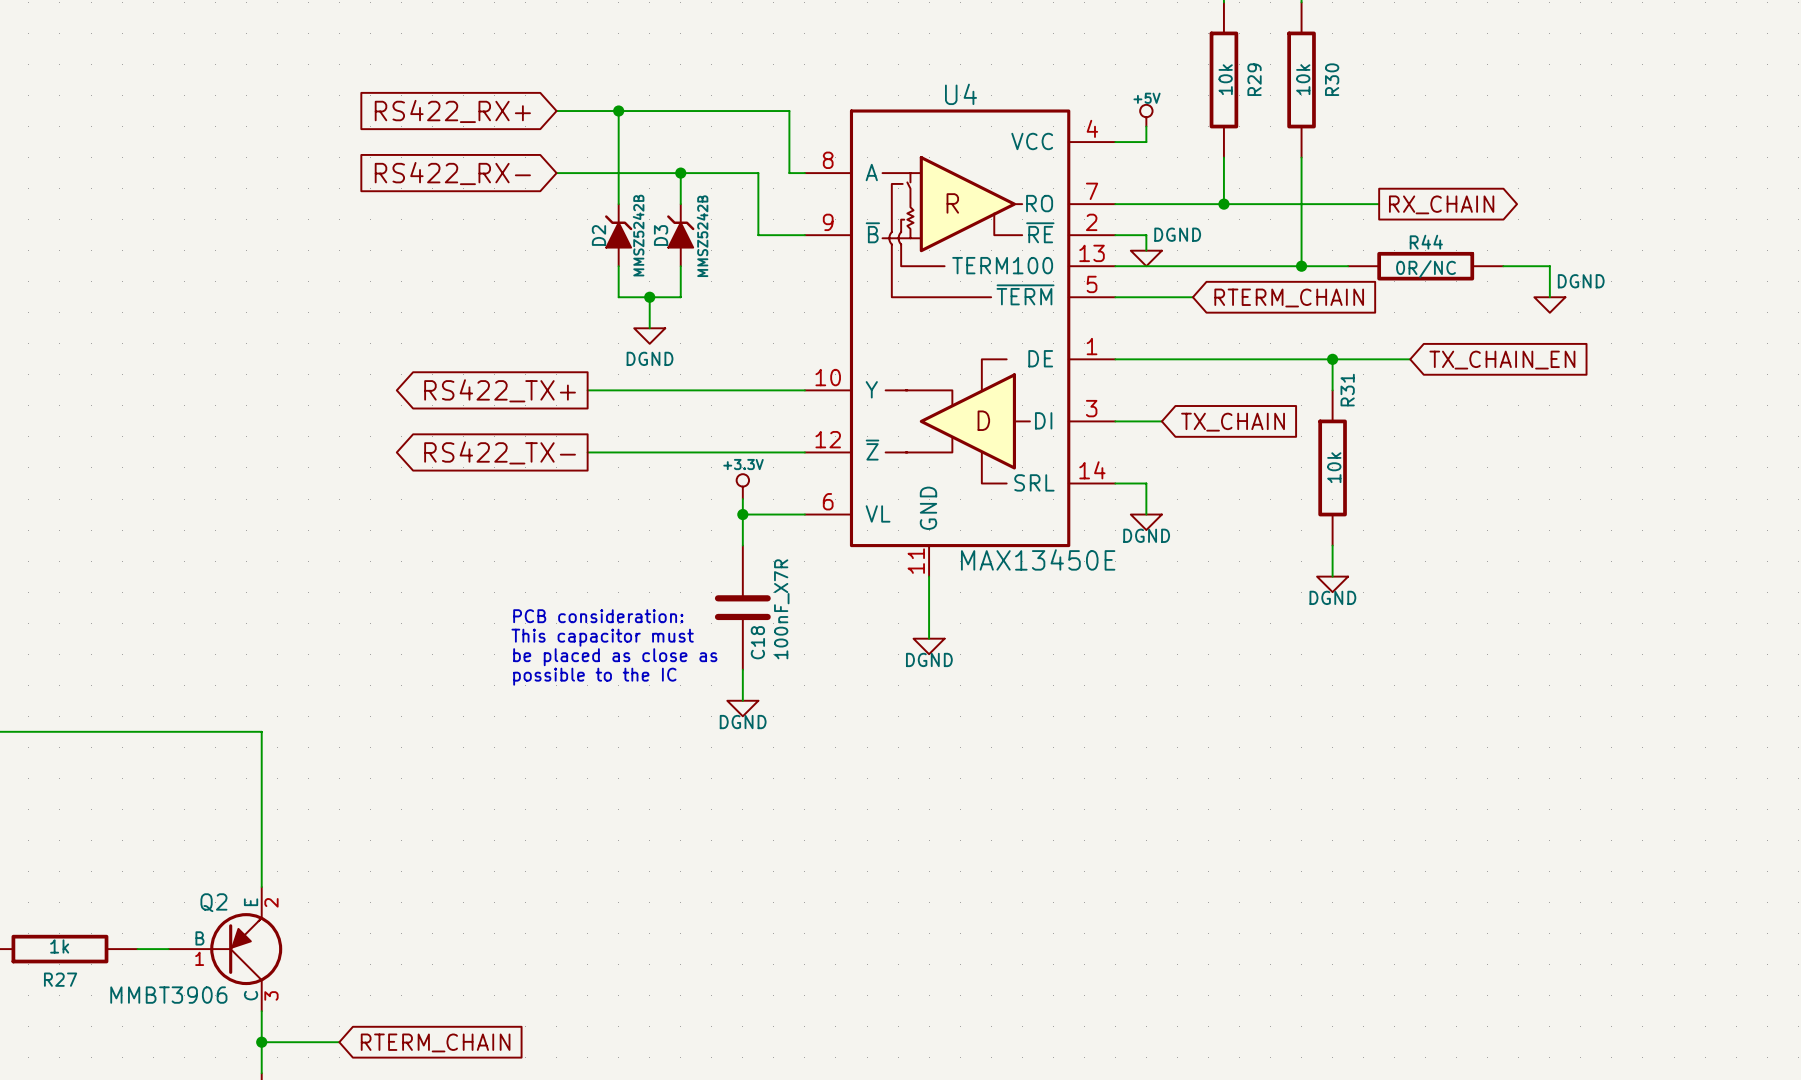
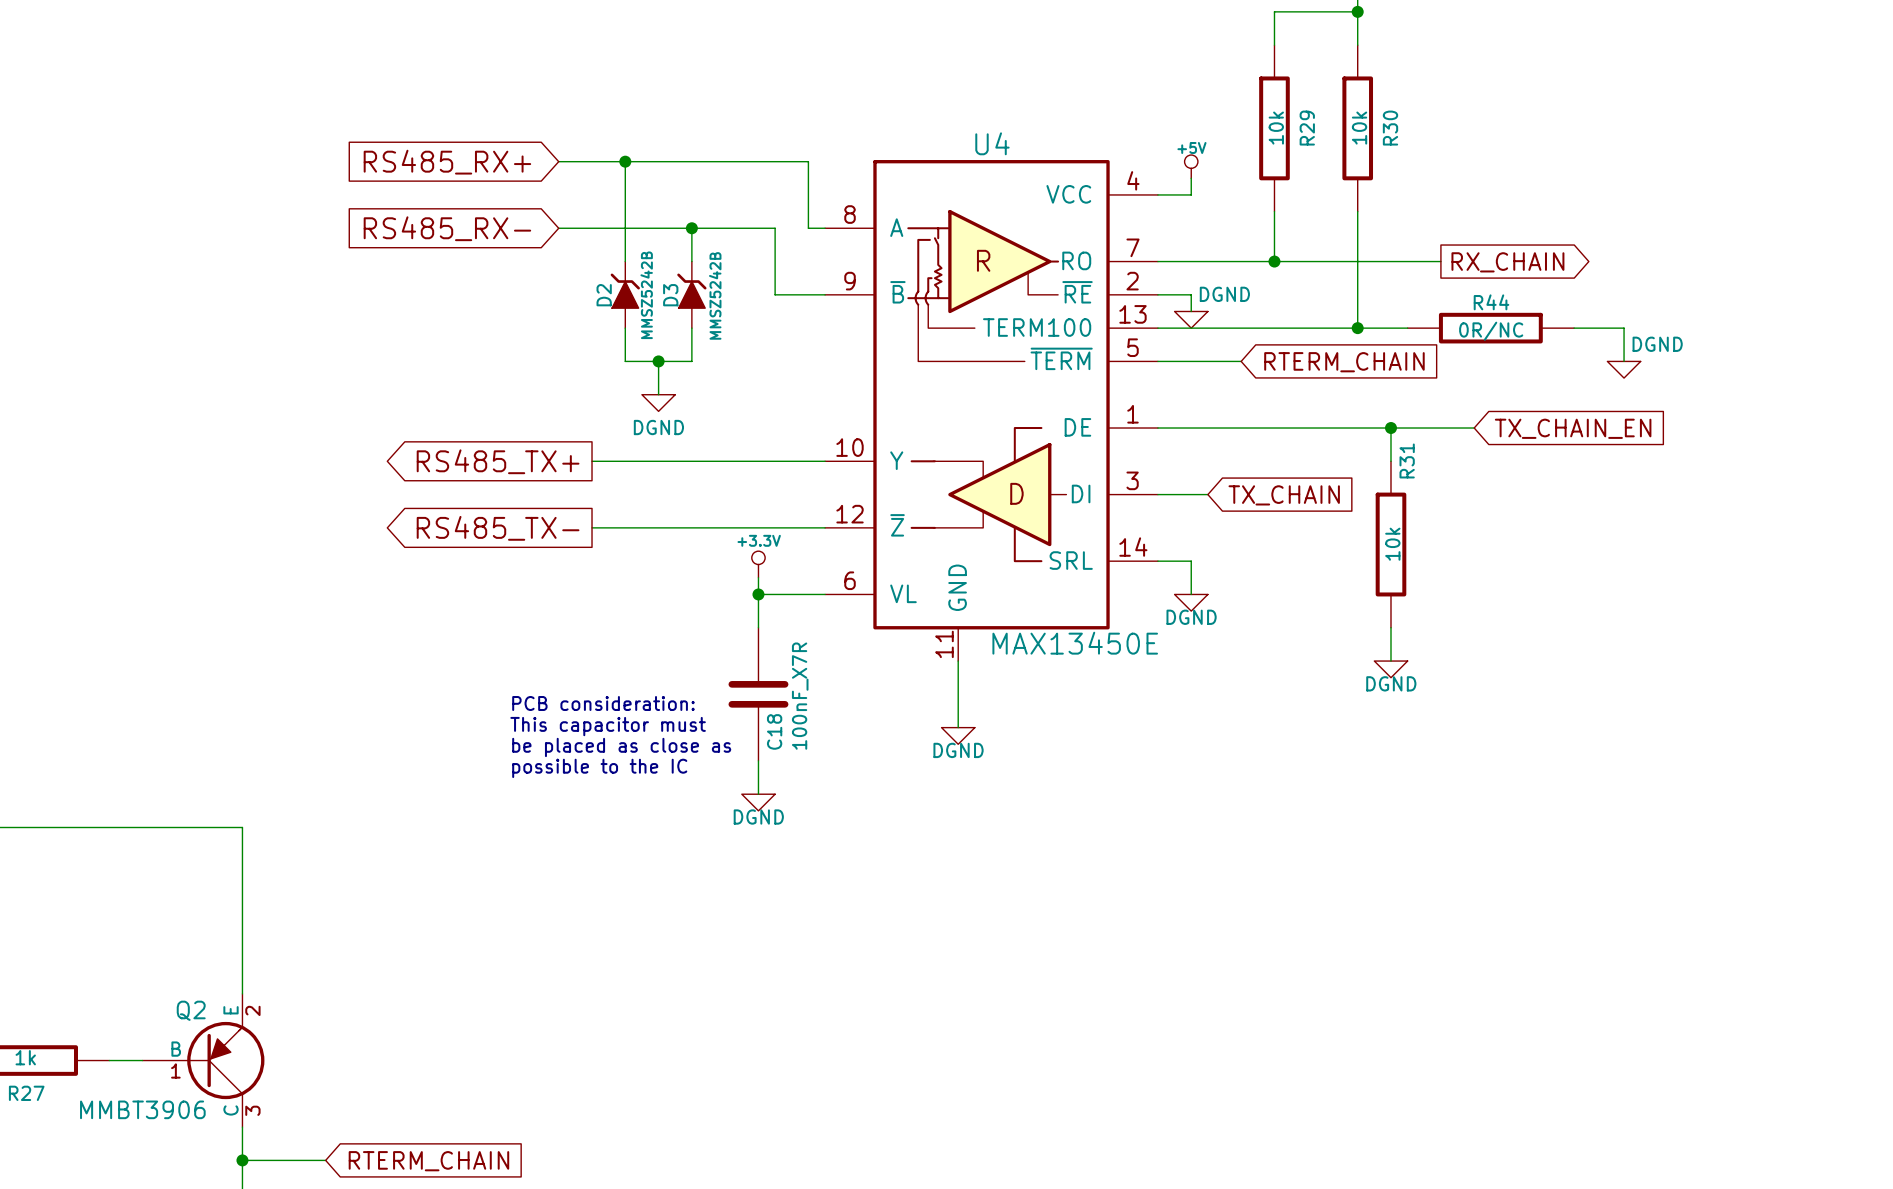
global label: RS422_RX+ (452, 111) -> RS485_RX+ (447, 162)
global label: RS422_RX- (452, 173) -> RS485_RX- (447, 228)
global label: RS422_TX+ (500, 390) -> RS485_TX+ (498, 461)
global label: RS422_TX- (500, 452) -> RS485_TX- (498, 528)

